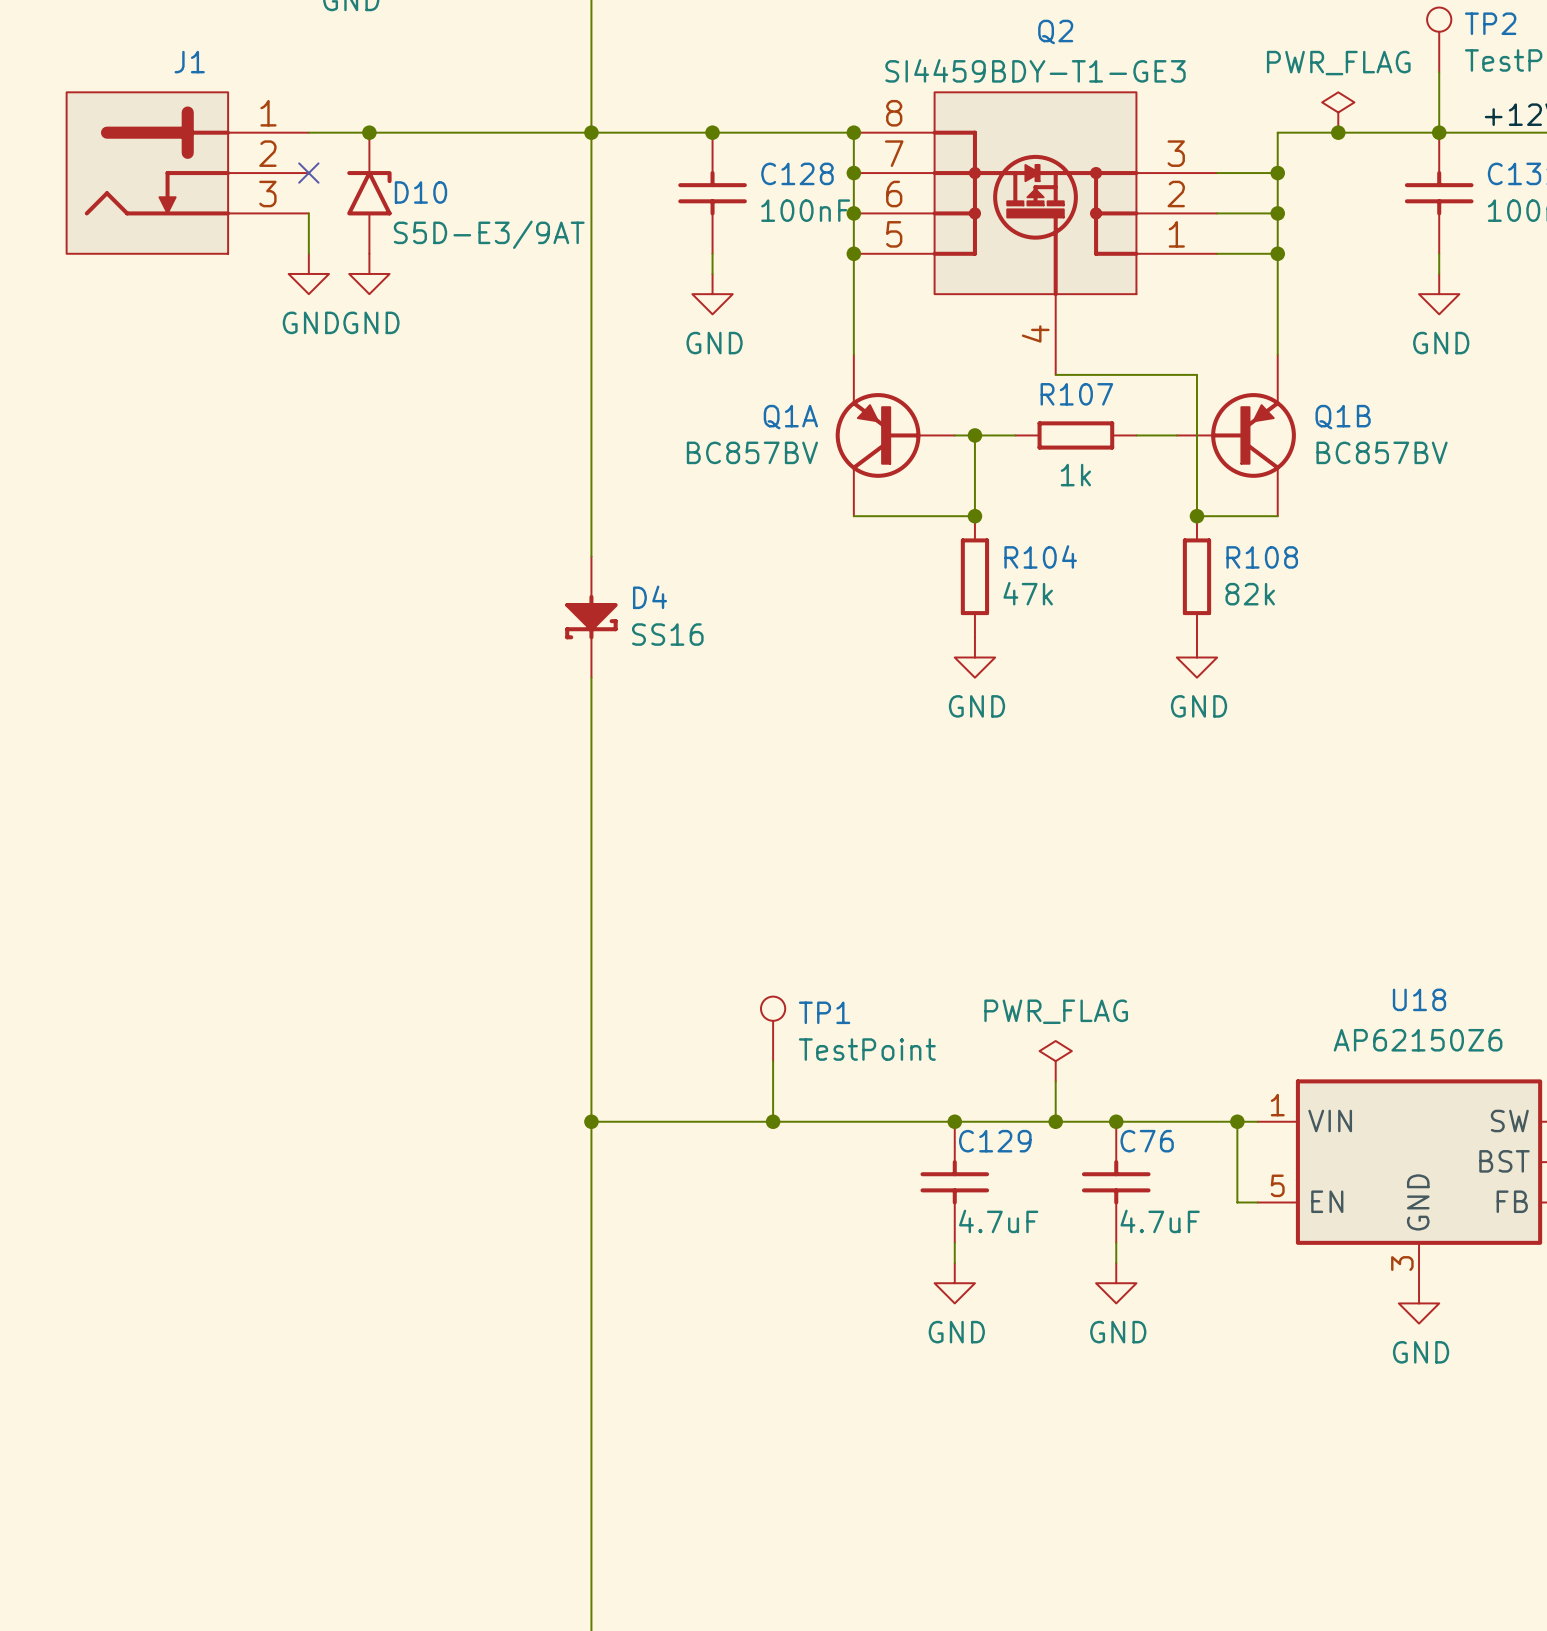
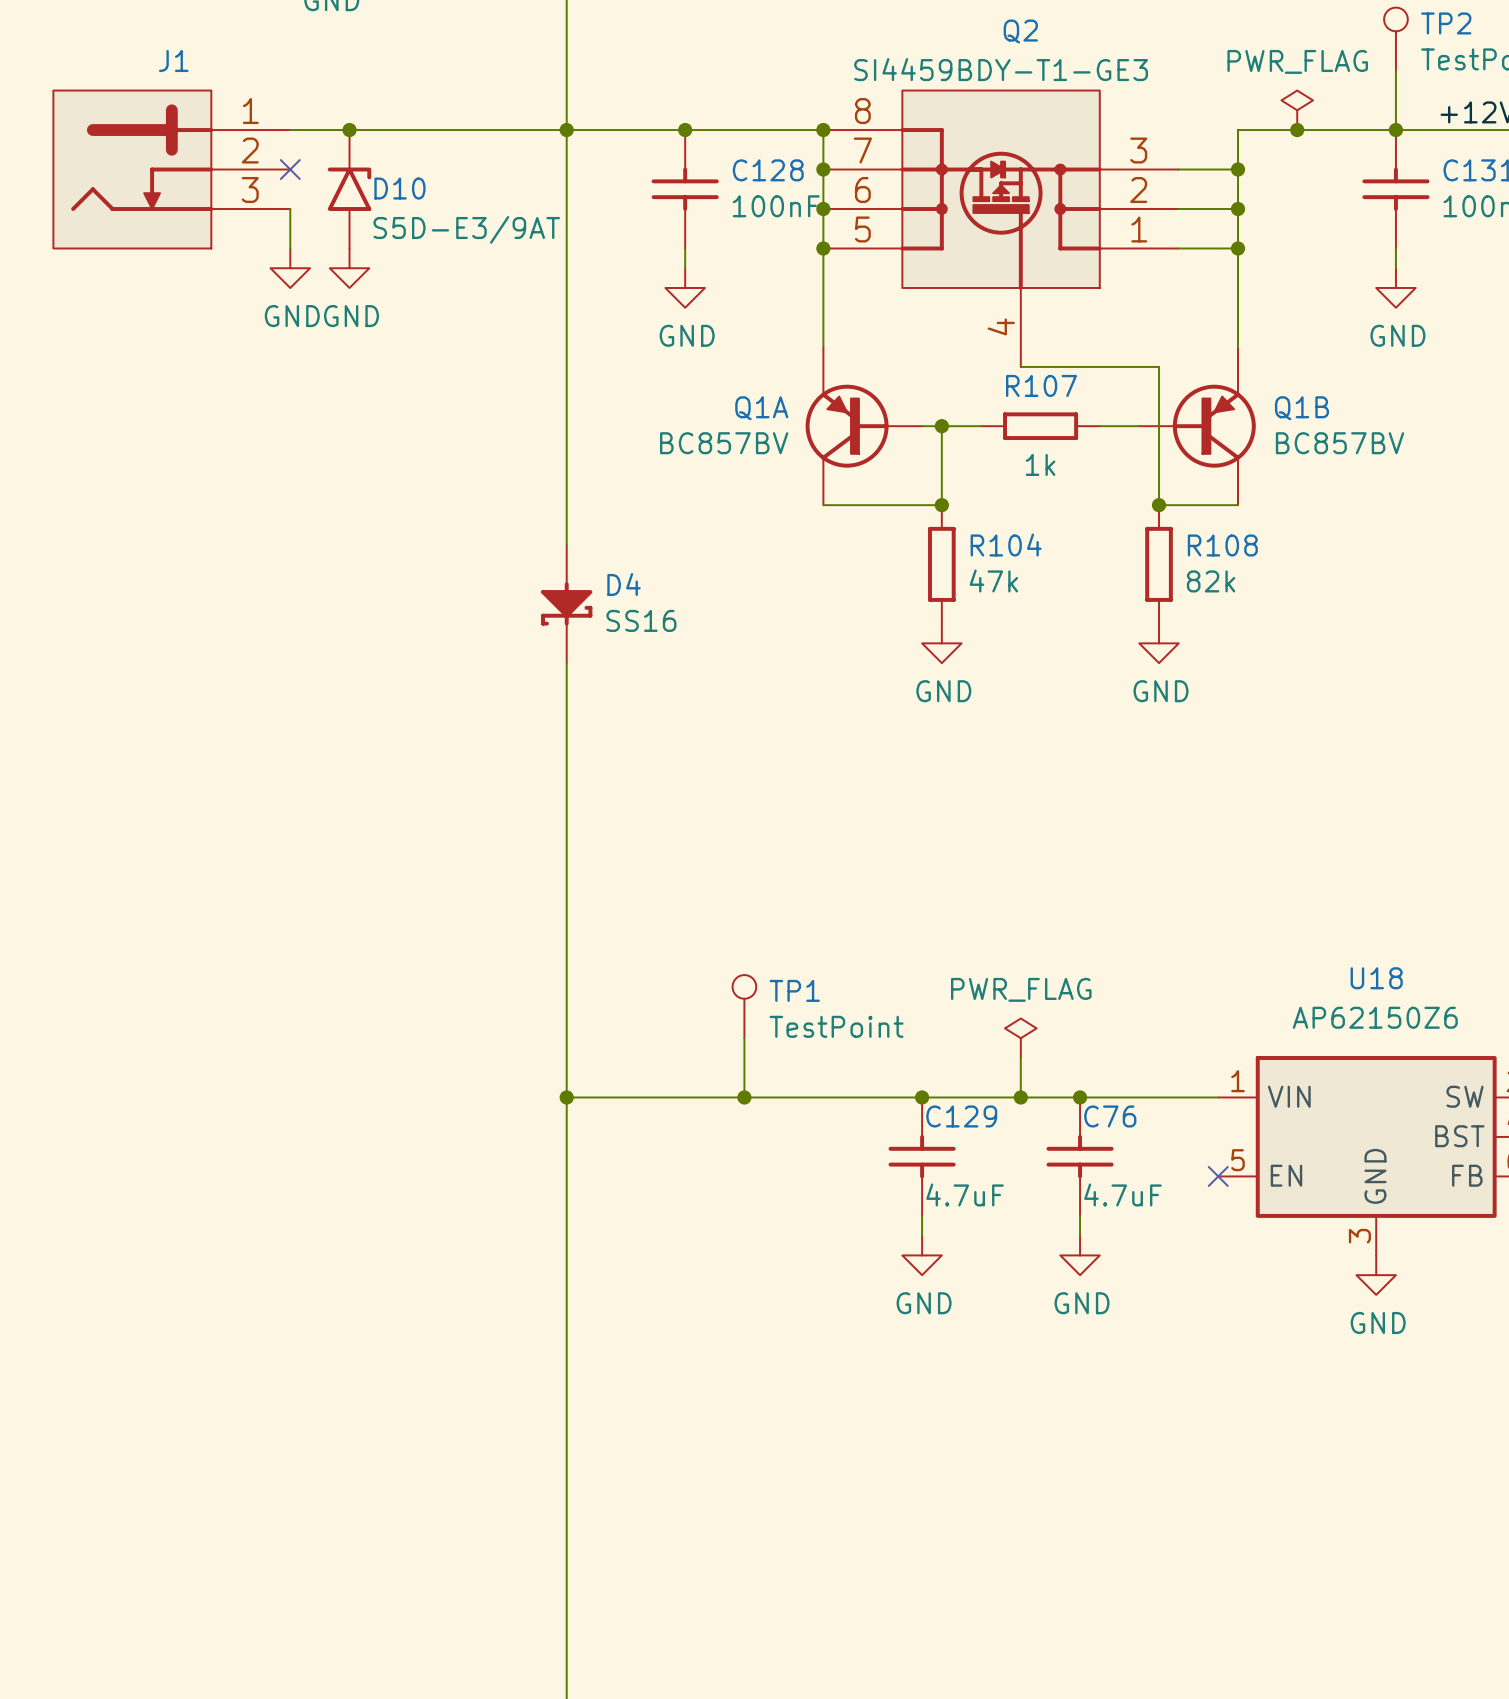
wire: (1237, 1121) (1237, 1202) (1257, 1202) -> none
junction: (1237, 1121) -> none
no-connect mark: none -> (1218, 1176)

